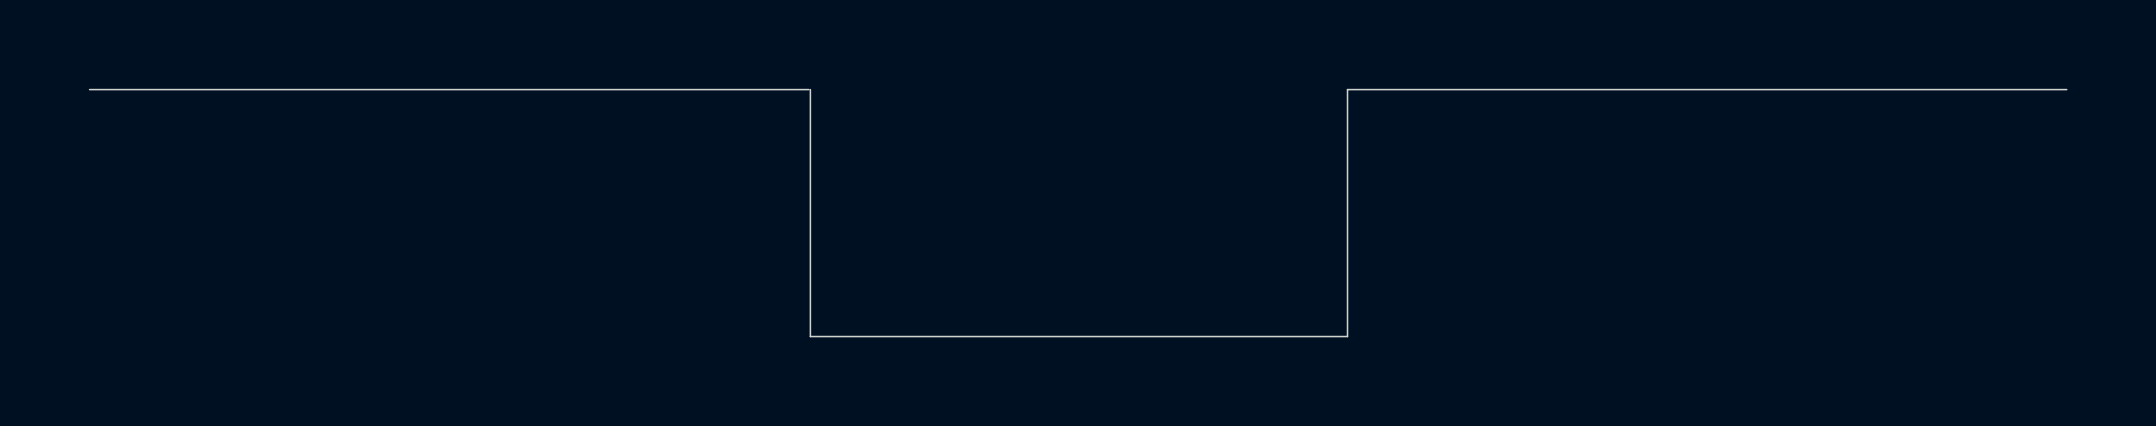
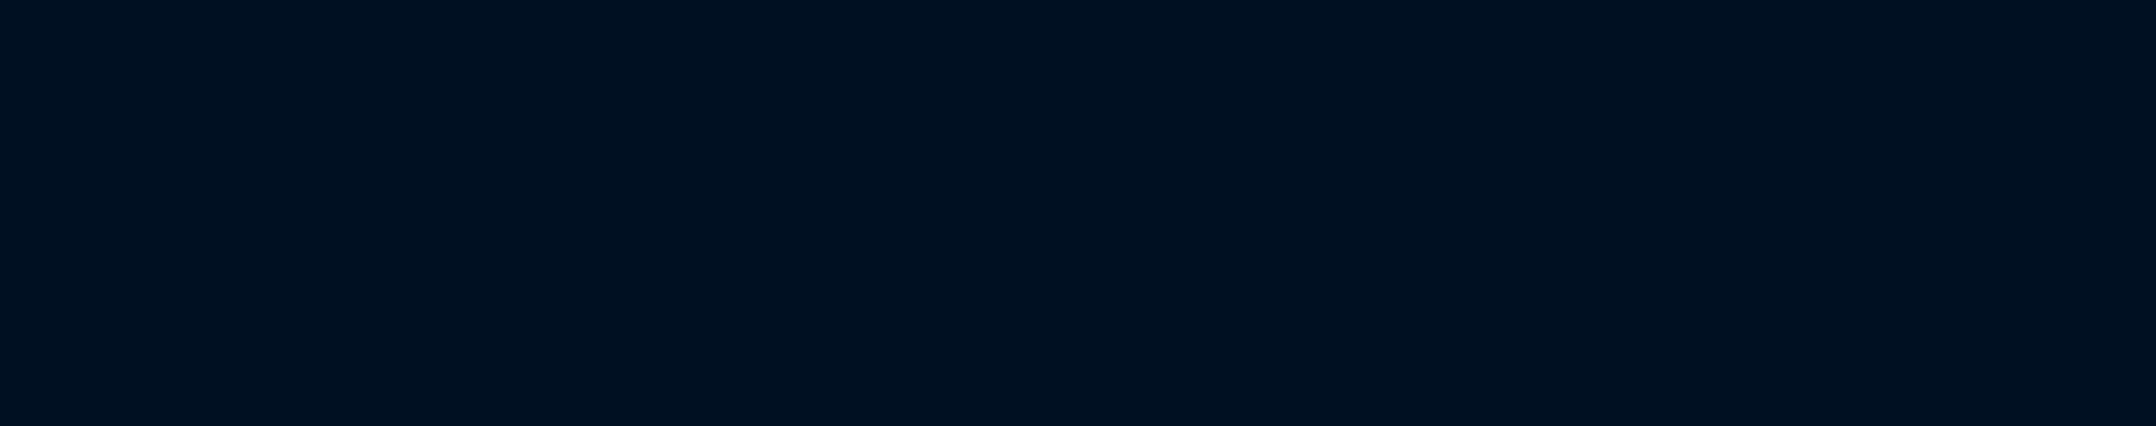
board edge: (89, 89) (808, 89) -> none
board edge: (810, 89) (810, 336) (1347, 336) (1347, 89) (2066, 89) -> none

